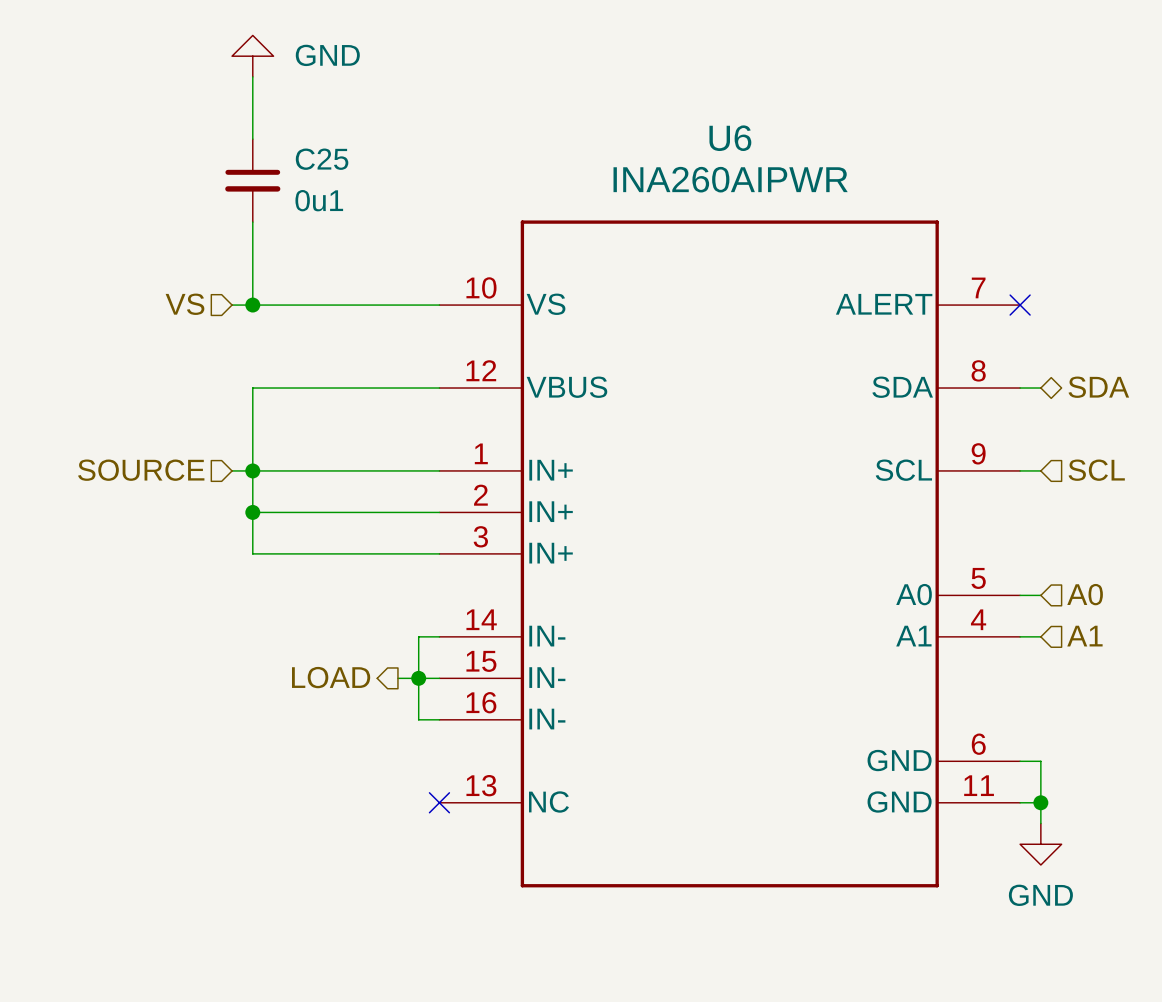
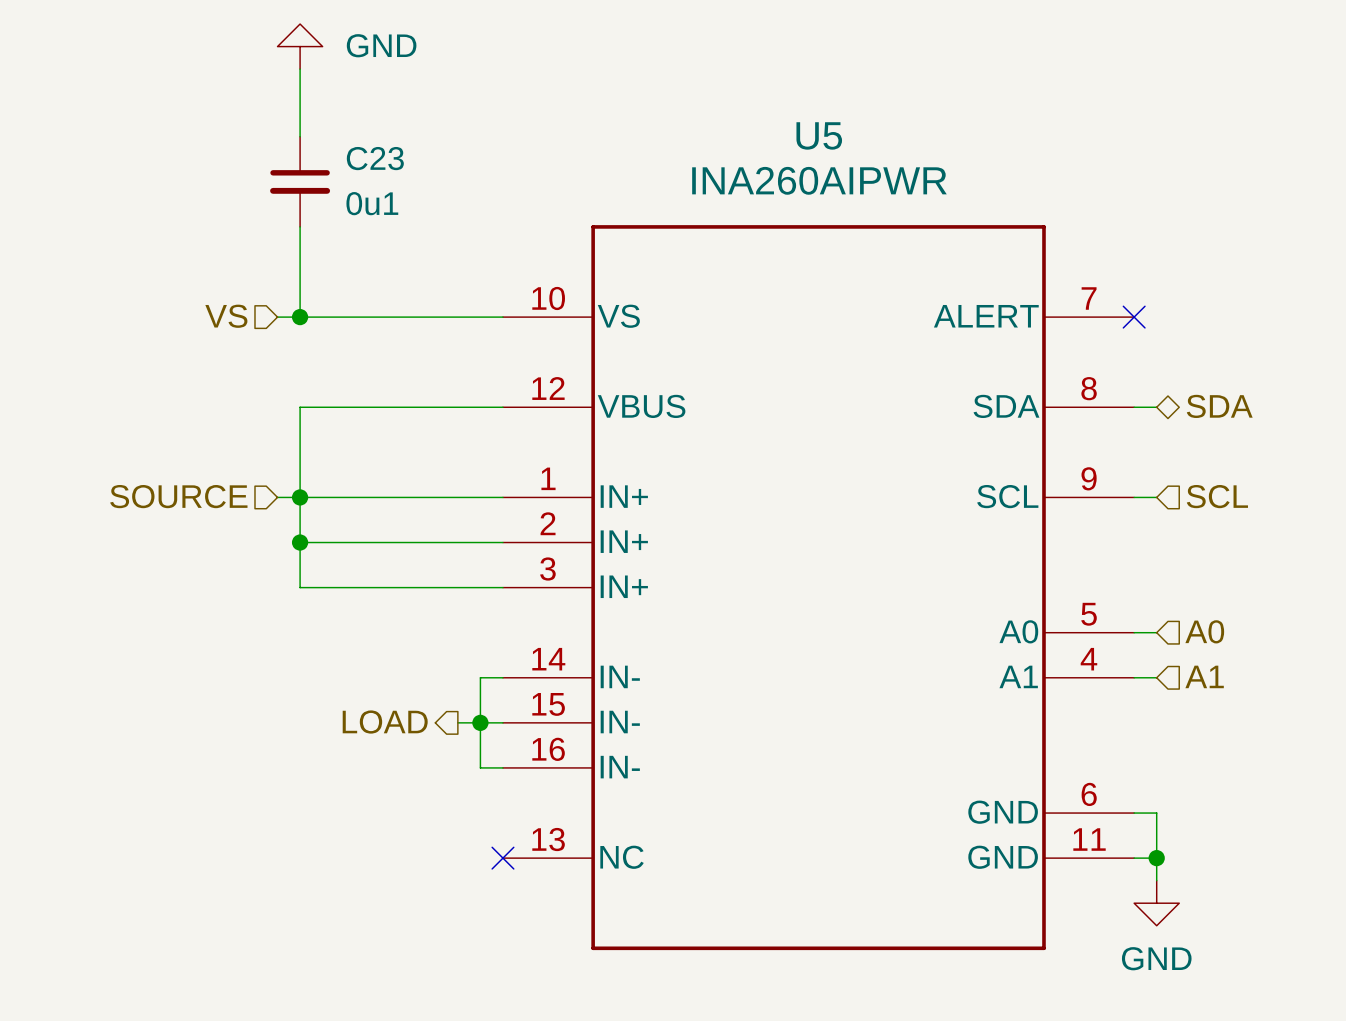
U6 name: U6 (730, 138) -> U5 (819, 135)
C25 name: C25 (322, 159) -> C23 (375, 158)

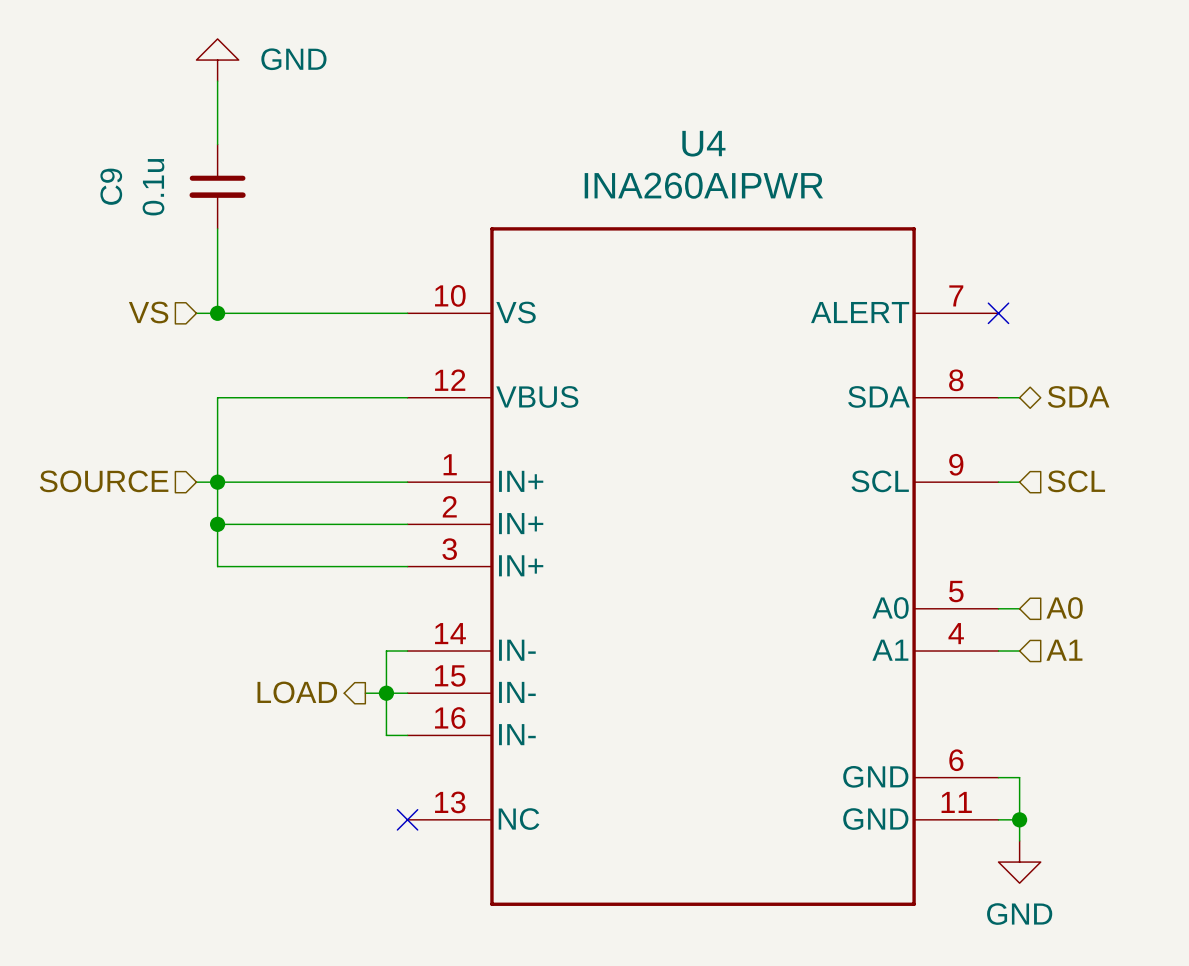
U5 name: U5 (819, 135) -> U4 (703, 143)
C23 name: C23 (375, 158) -> C9 (111, 186)
C23 value: 0u1 (372, 203) -> 0.1u (153, 187)

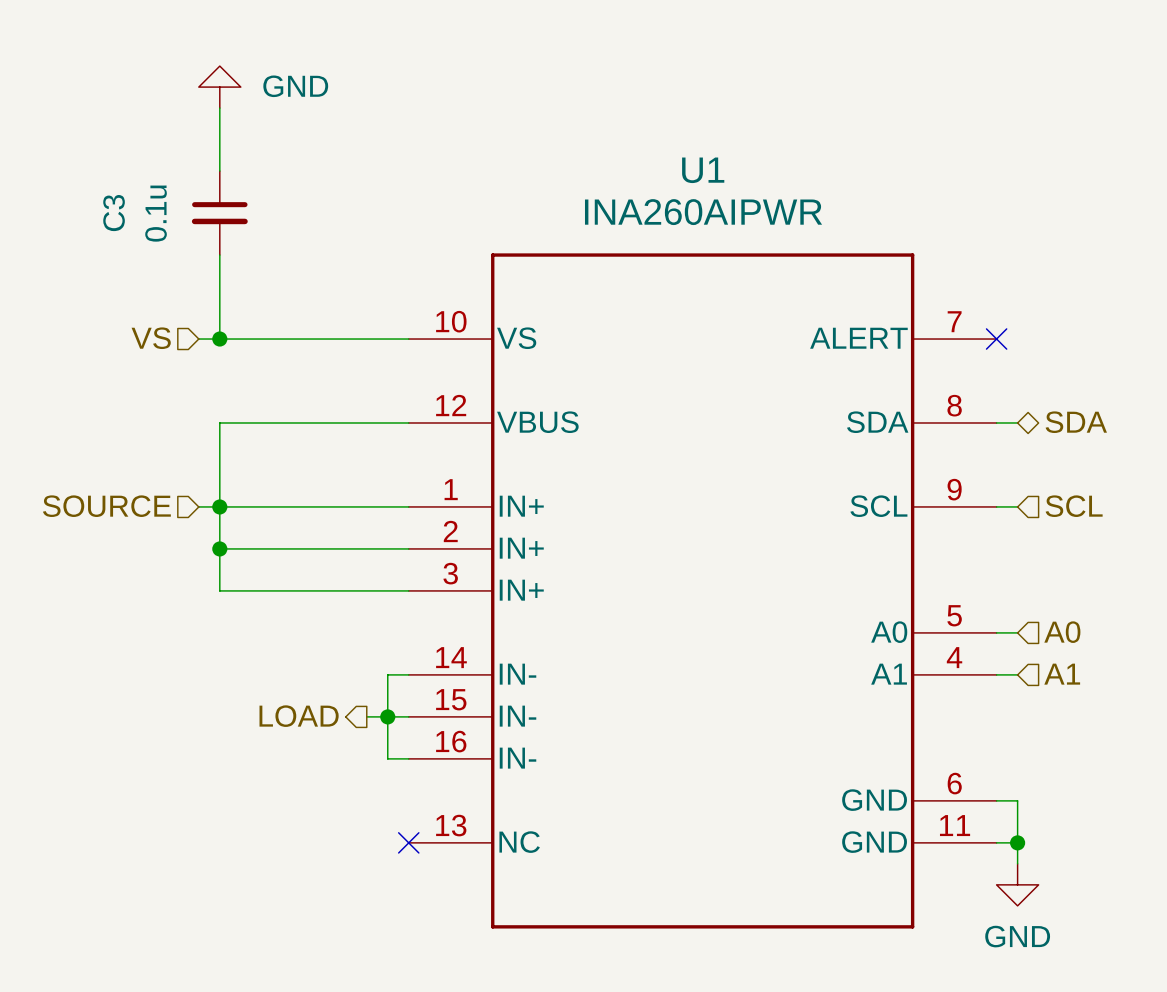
U4 name: U4 (703, 143) -> U1 (703, 170)
C9 name: C9 (111, 186) -> C3 (114, 213)

